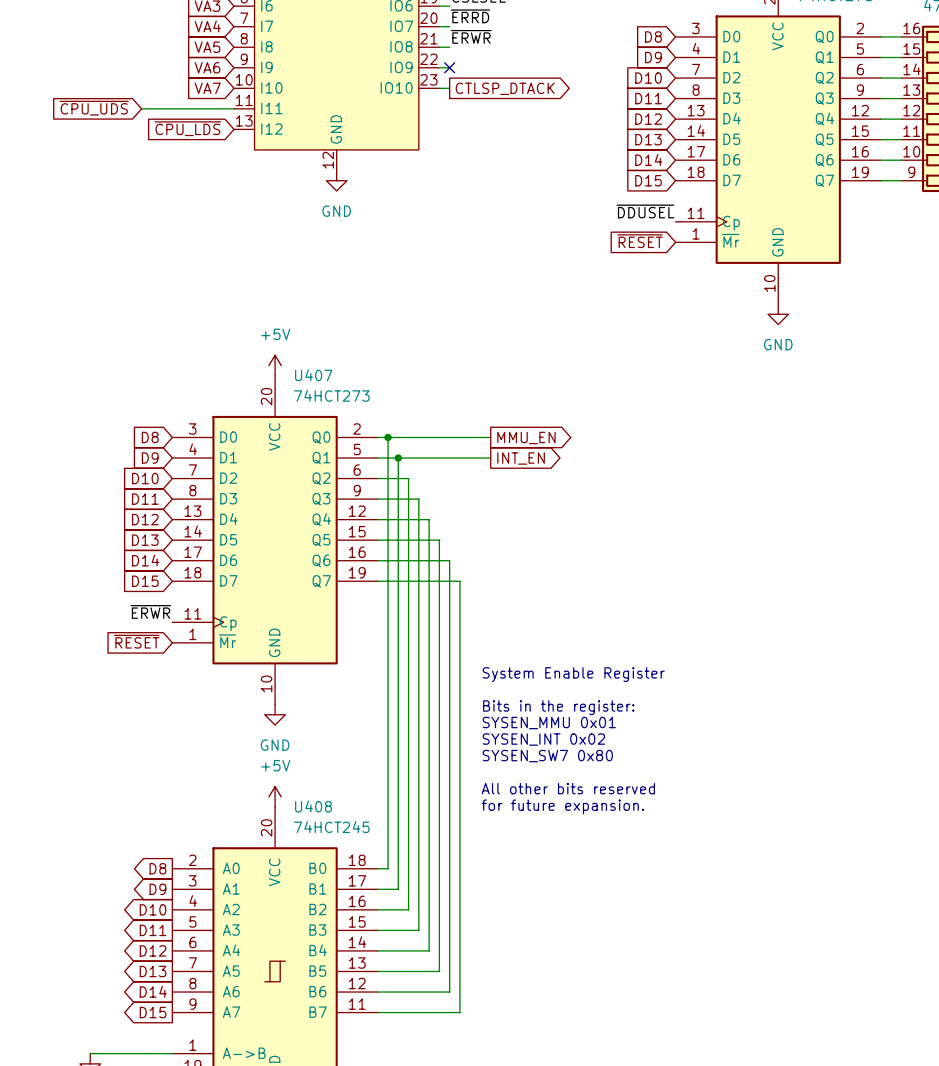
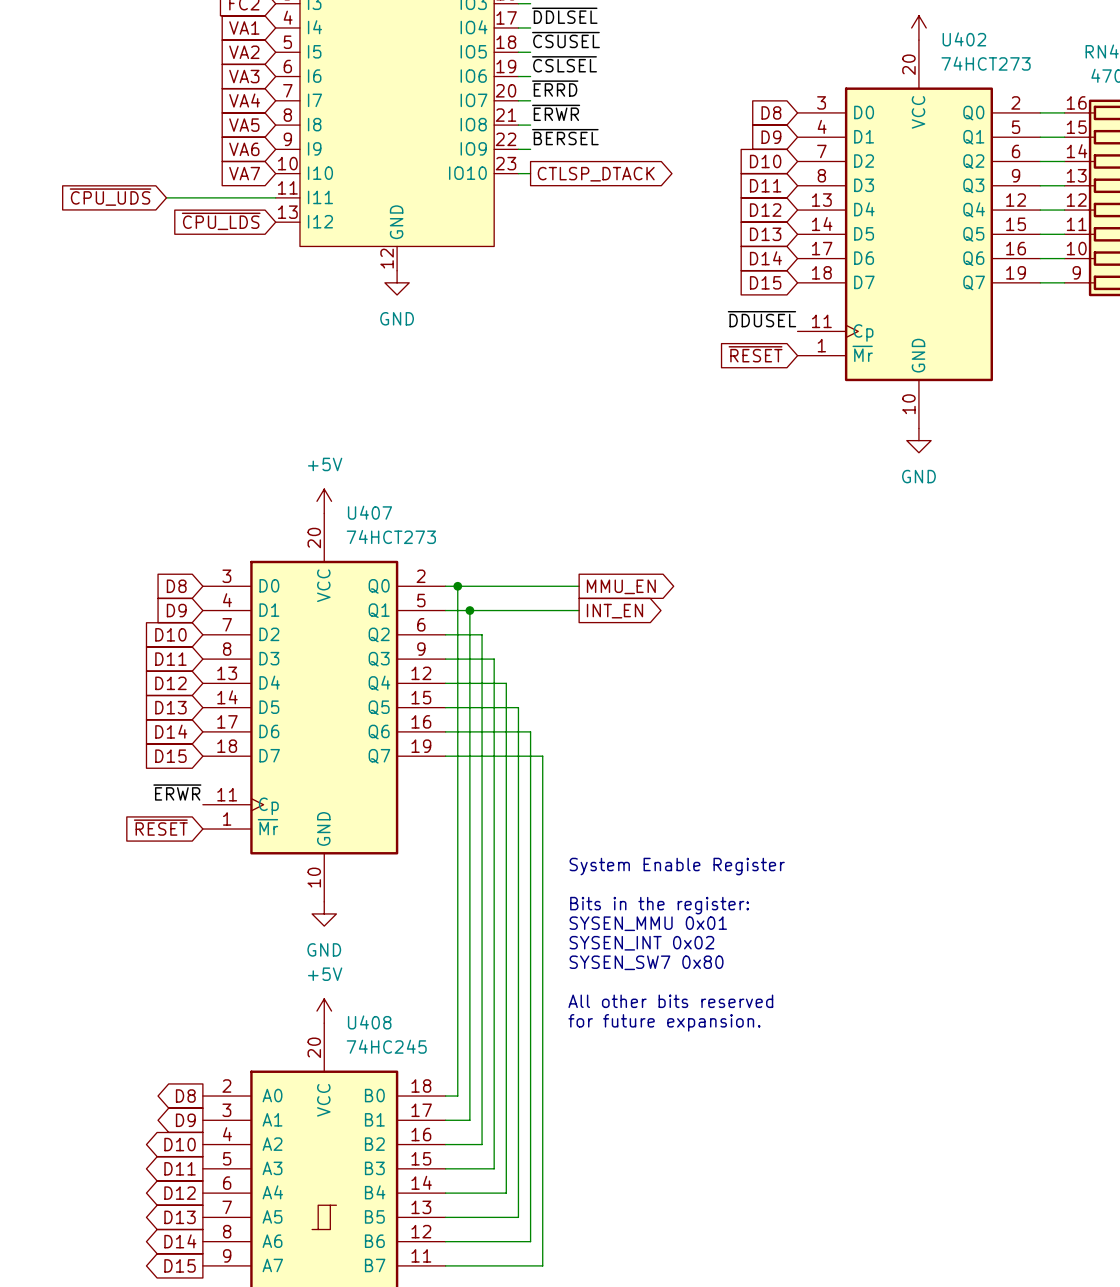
label: none -> ~{BERSEL} (565, 137)
no-connect mark: (449, 67) -> none
U408 value: 74HCT245 (331, 827) -> 74HC245 (386, 1046)

